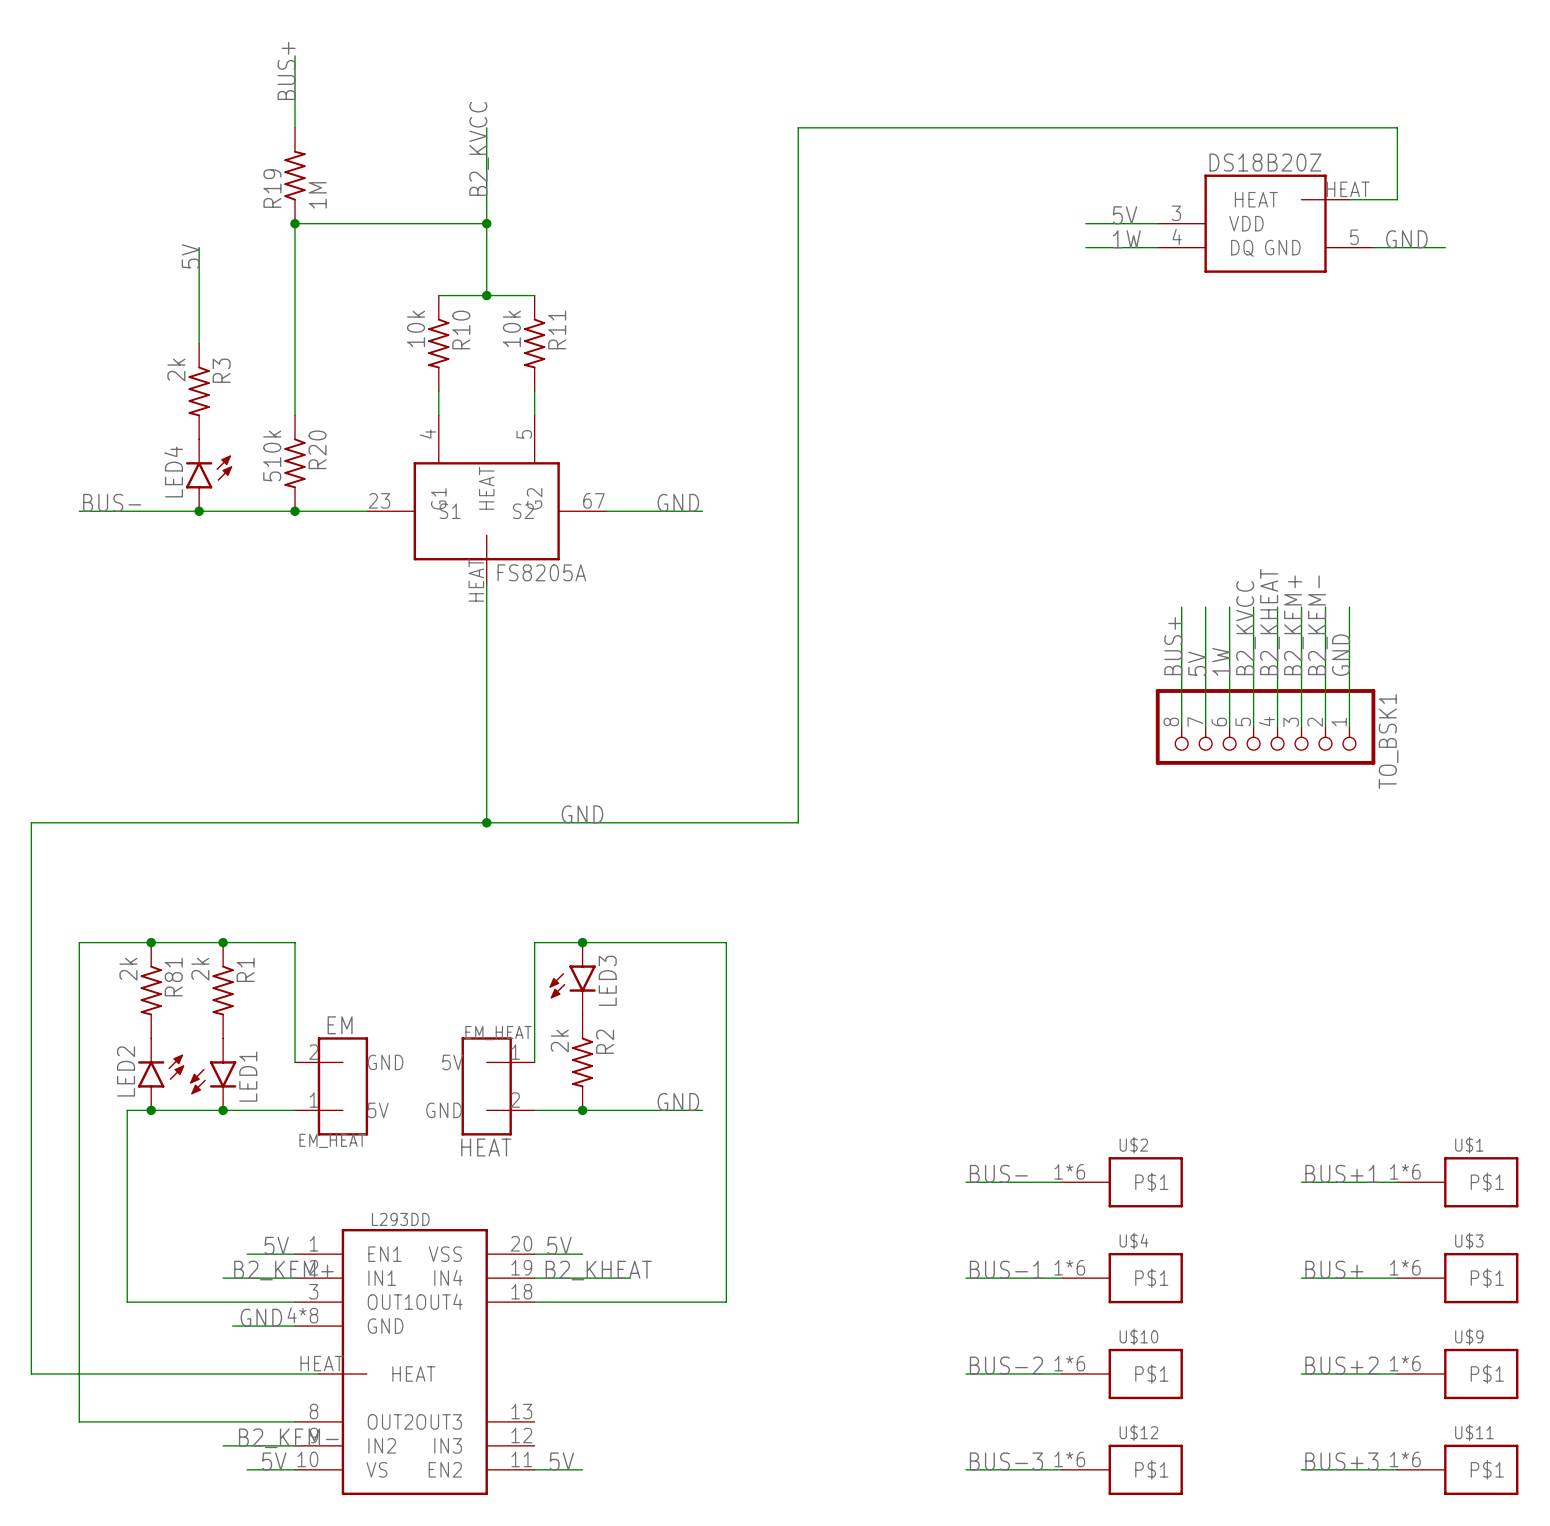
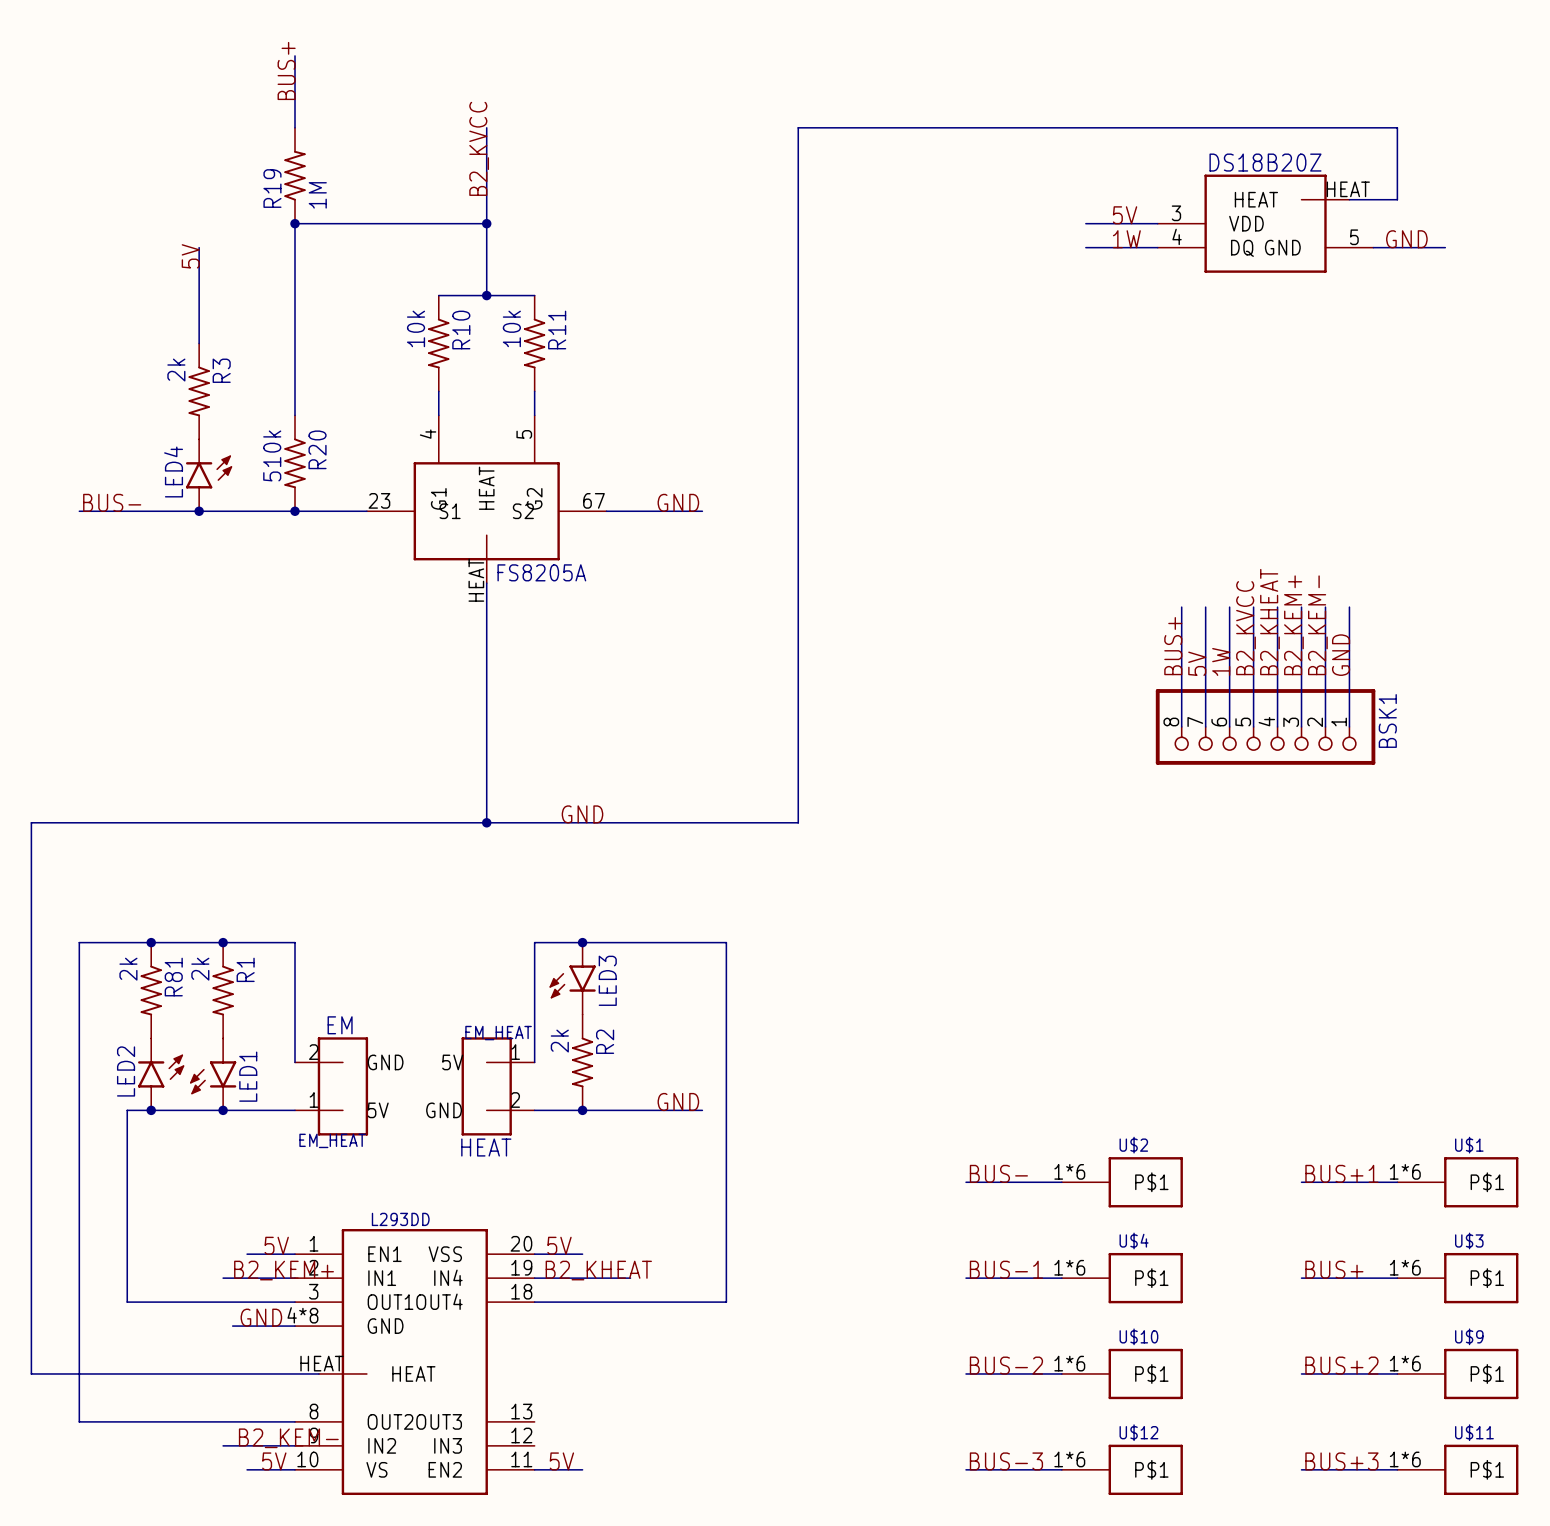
TO_BSK1 name: TO_BSK1 (1388, 741) -> BSK1 (1387, 720)

